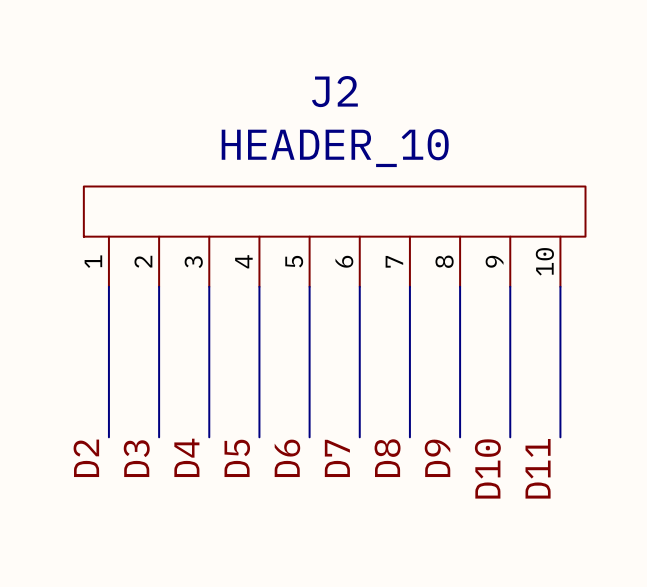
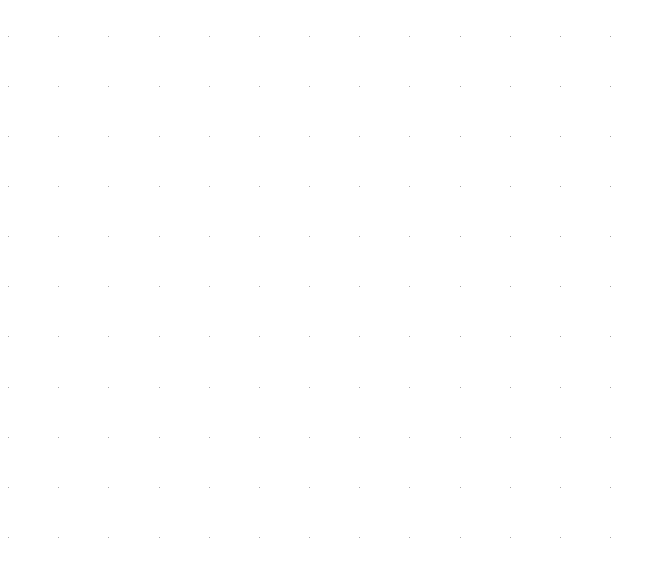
J2: HEADER_10 (334, 236) -> none
wire: (108, 286) (108, 437) -> none
wire: (159, 286) (159, 437) -> none
wire: (209, 286) (209, 437) -> none
wire: (259, 286) (259, 437) -> none
wire: (309, 286) (309, 437) -> none
wire: (359, 286) (359, 437) -> none
wire: (409, 286) (409, 437) -> none
wire: (460, 286) (460, 437) -> none
wire: (510, 286) (510, 437) -> none
wire: (560, 286) (560, 437) -> none
label: D4 (186, 457) -> none
label: D2 (86, 458) -> none
label: D3 (136, 458) -> none
label: D5 (237, 458) -> none
label: D6 (287, 458) -> none
label: D7 (337, 458) -> none
label: D8 (387, 458) -> none
label: D9 (437, 458) -> none
label: D10 (487, 468) -> none
label: D11 (538, 468) -> none

